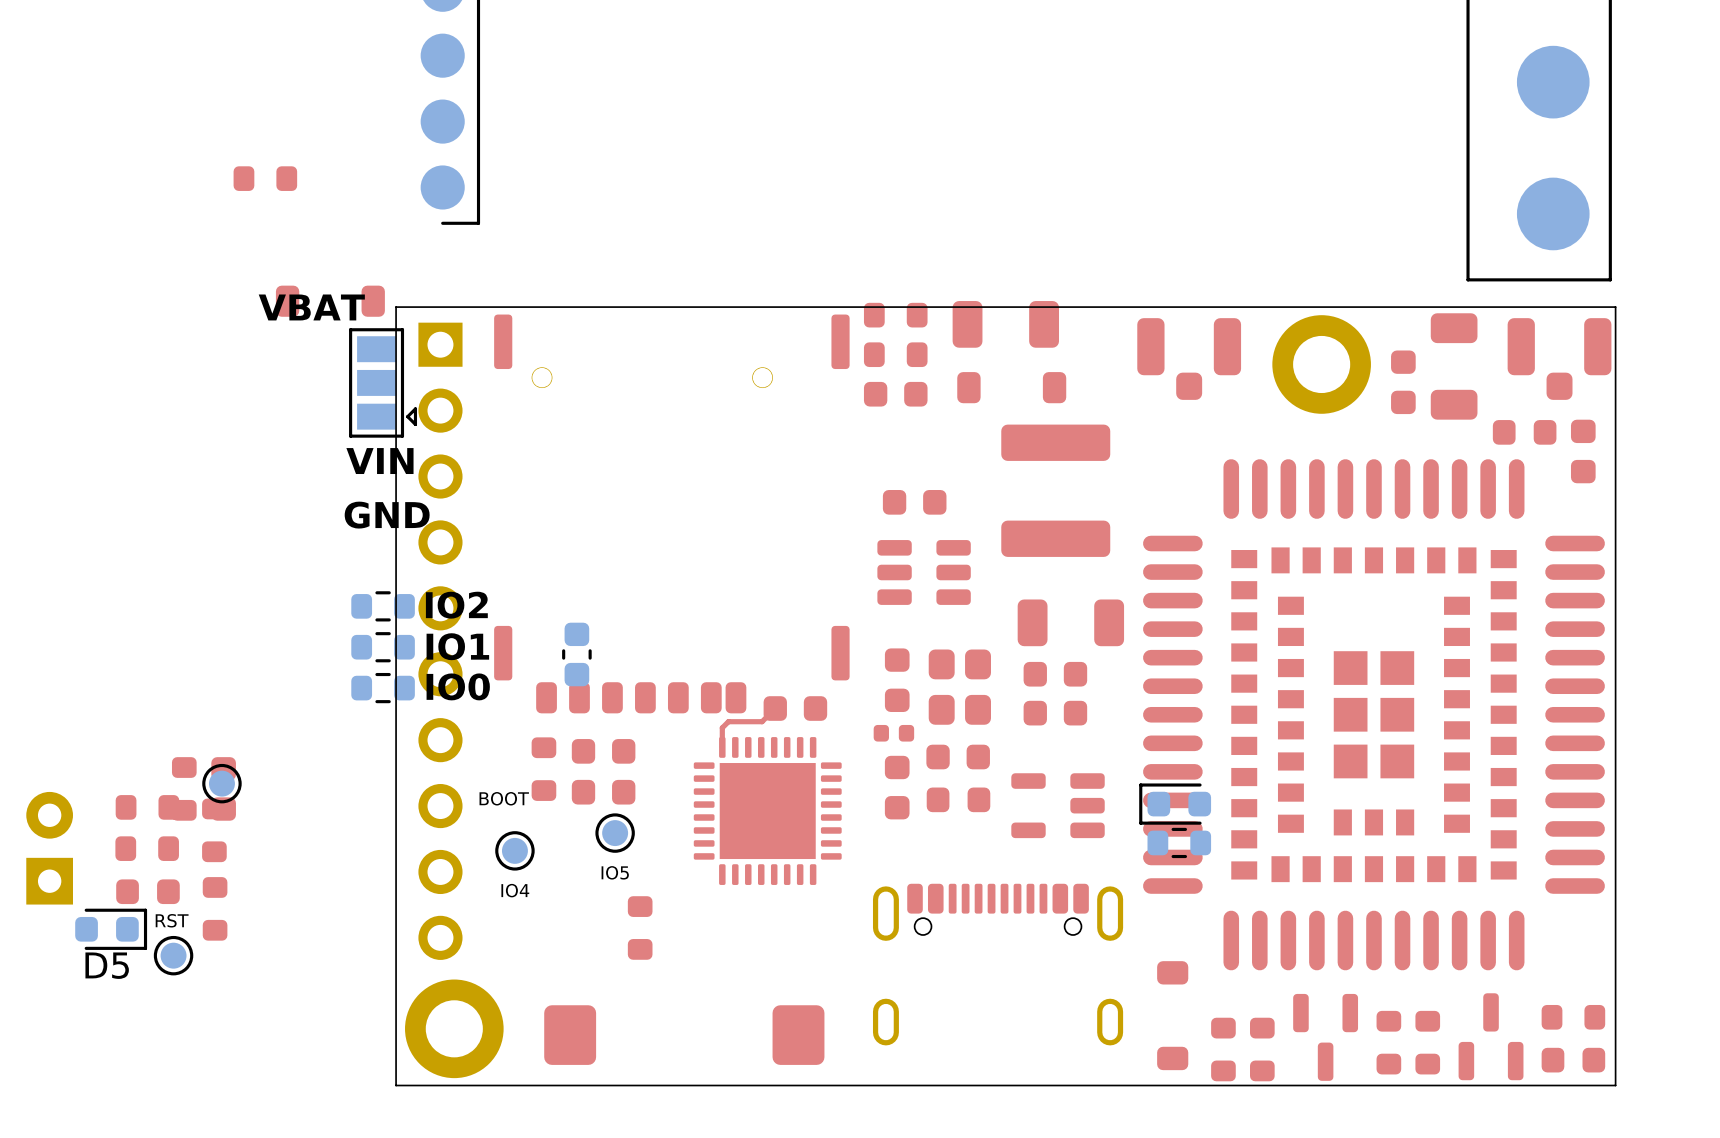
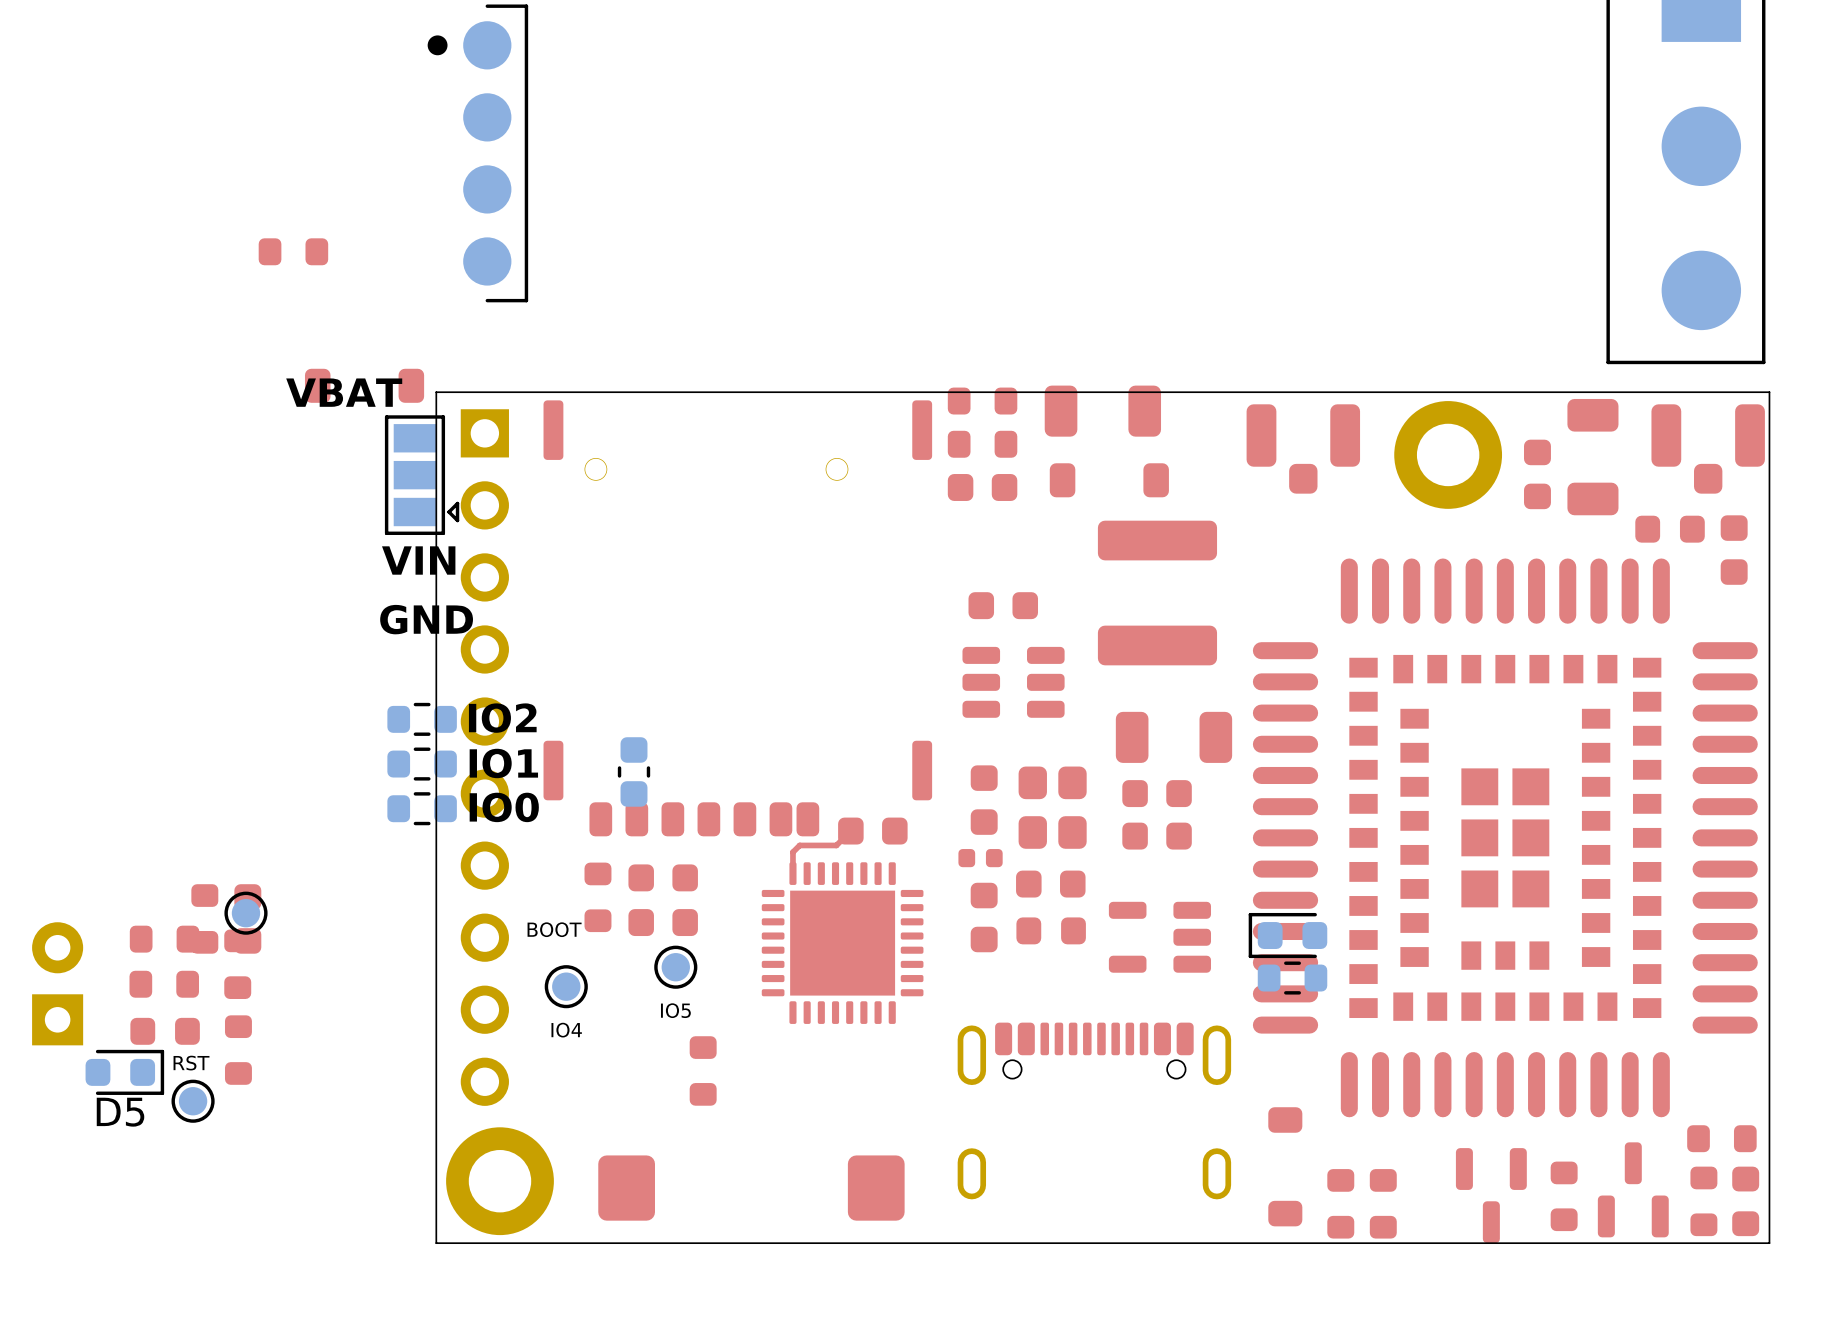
part: none -> (1721, 1138)
part: (1573, 1017) -> none
part position: (1325, 1037) -> (1491, 1195)
part: (1388, 1042) -> none
part: none -> (1703, 1201)
part rotation: 0° (1573, 1060) -> 90° clockwise (1745, 1201)

